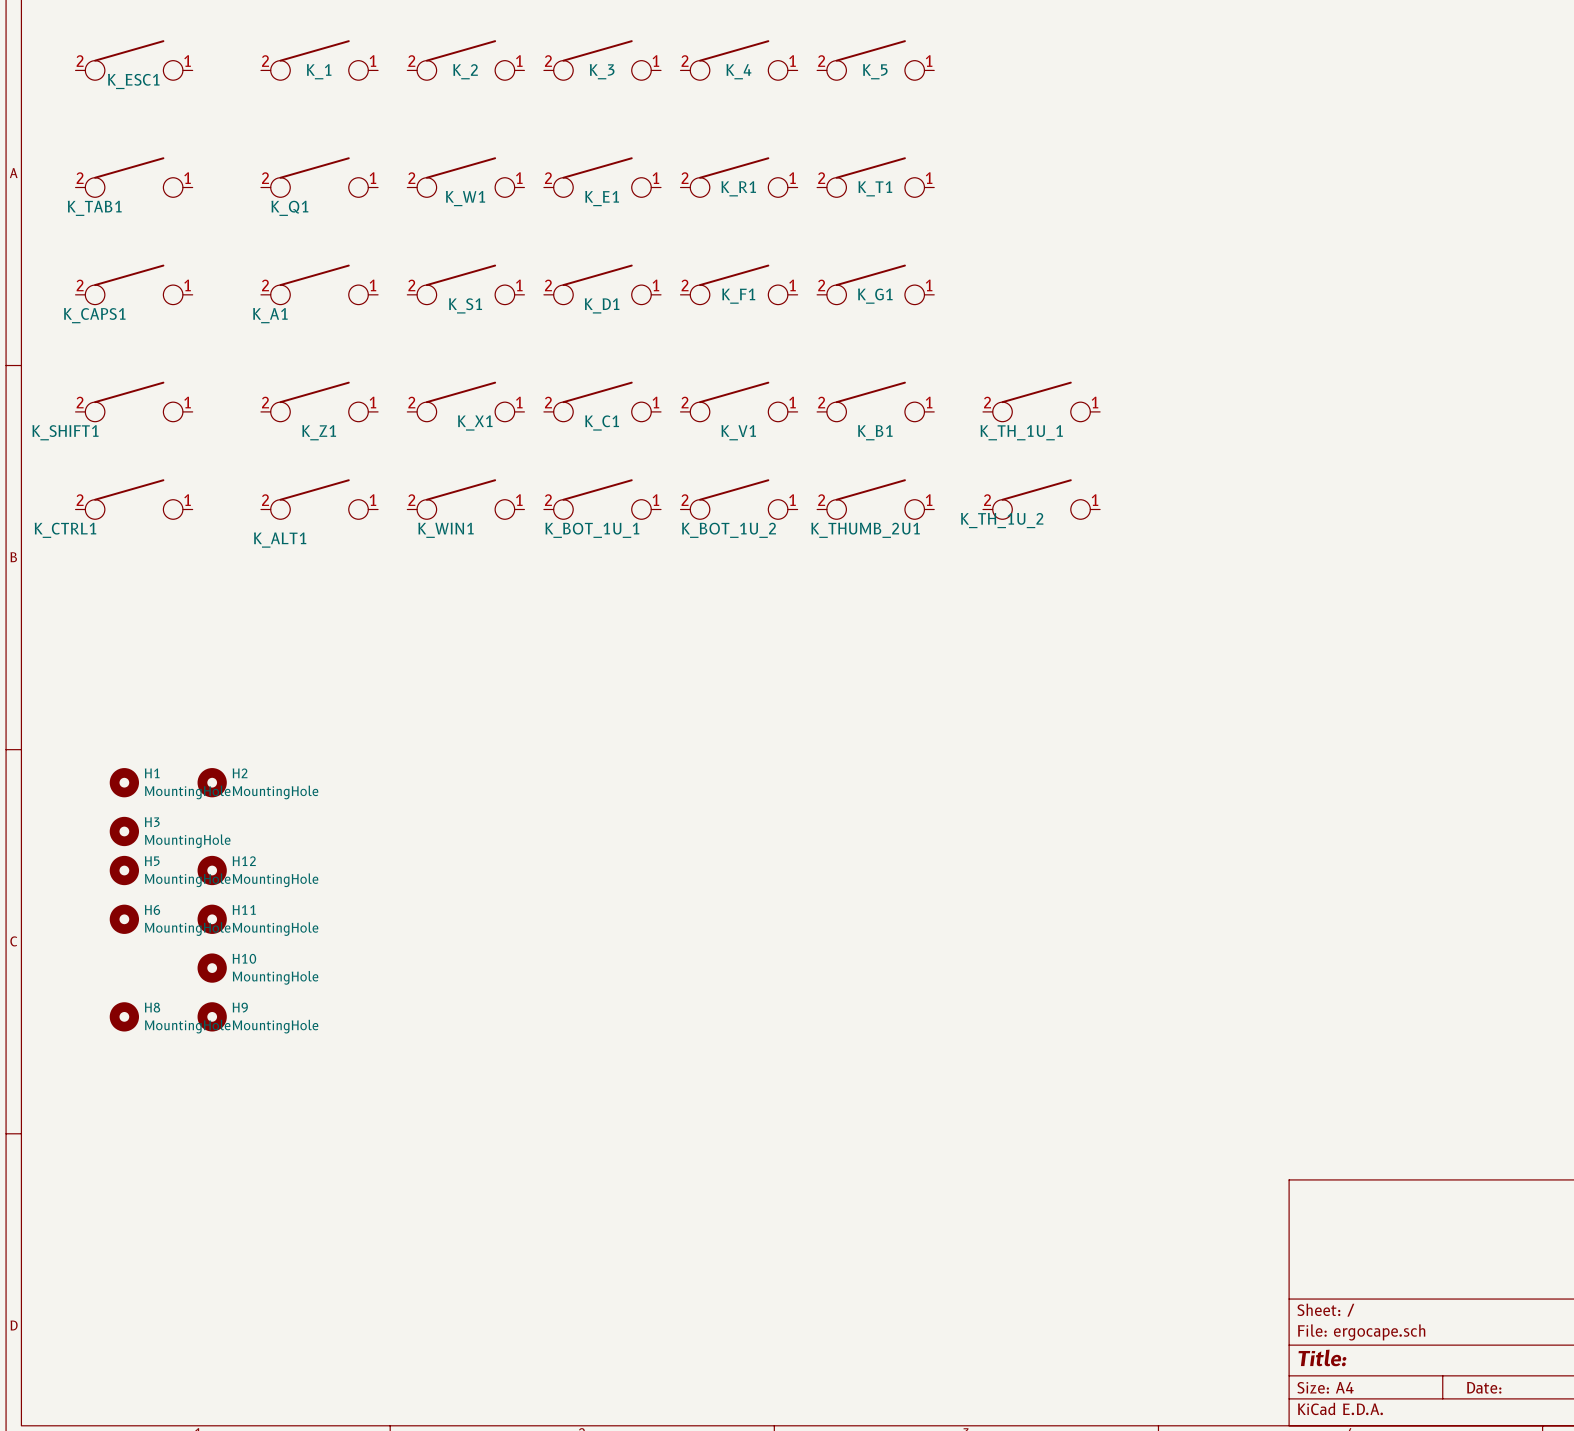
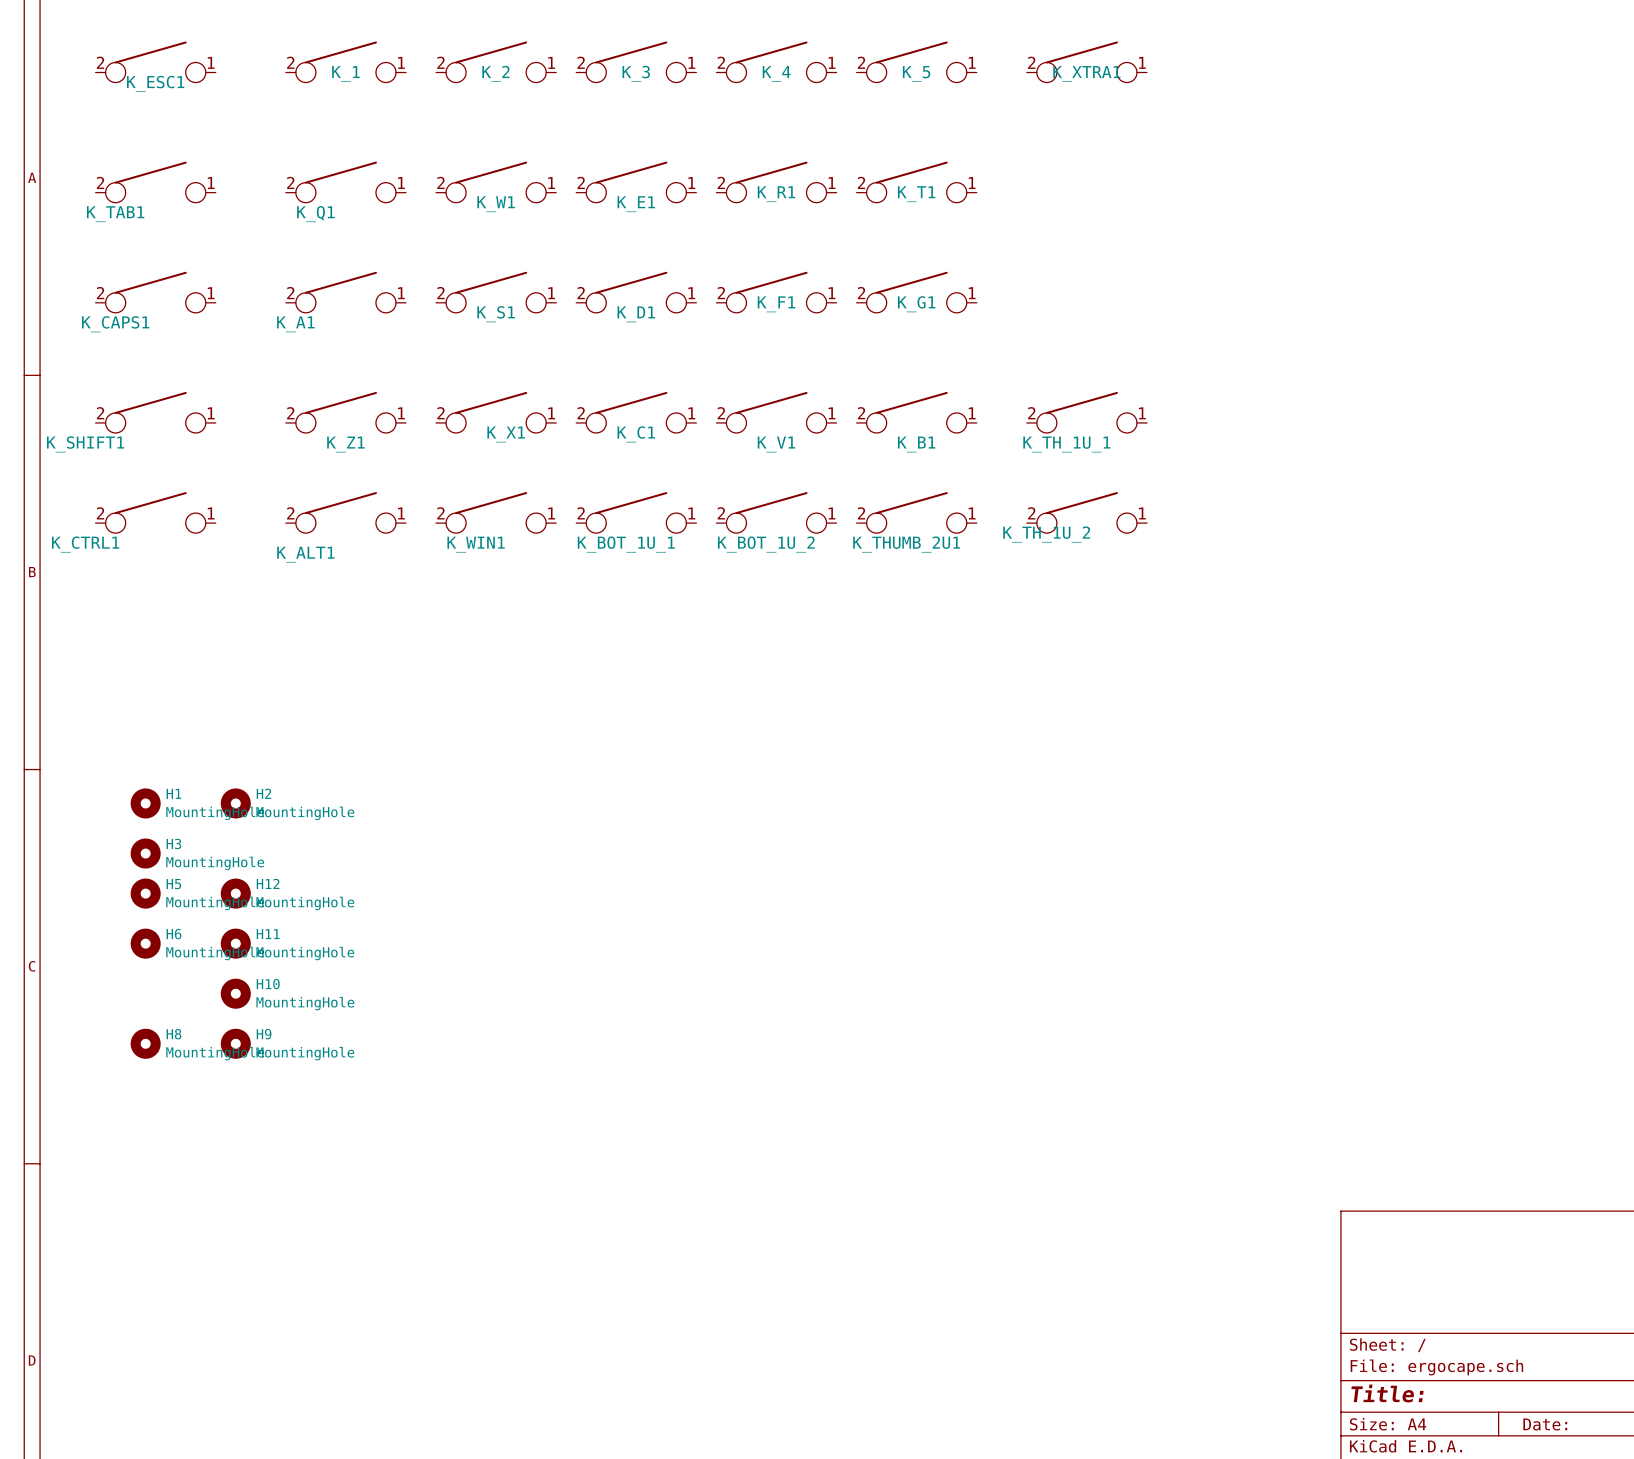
K_XTRA1: none -> (1086, 61)

